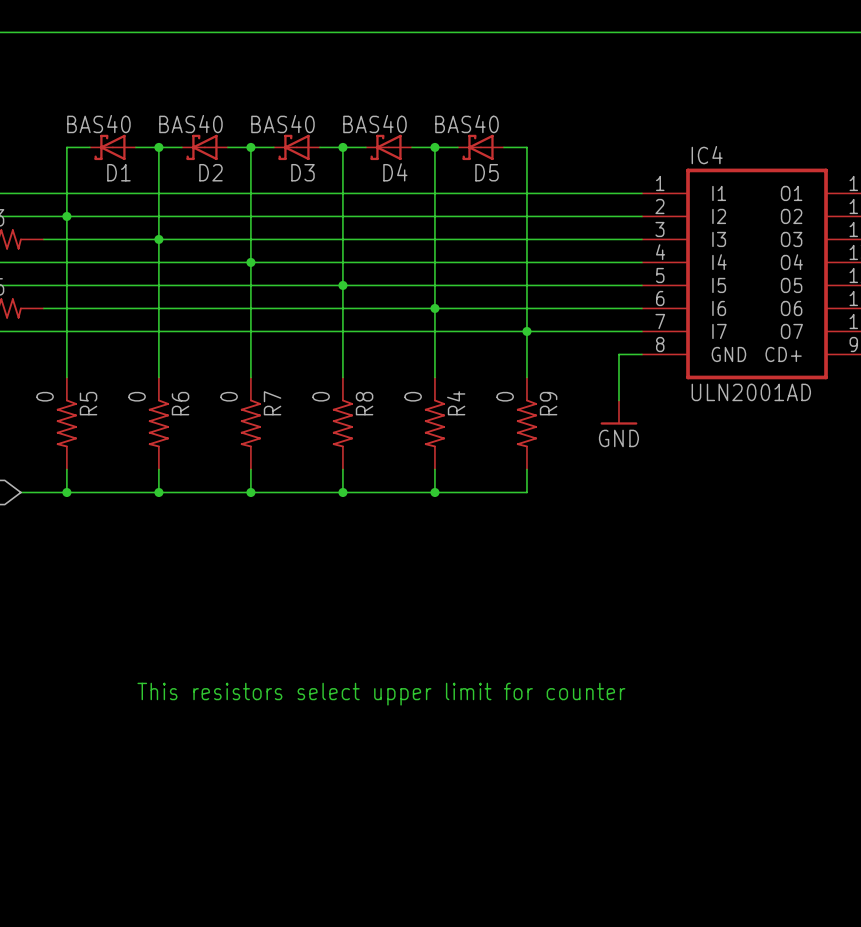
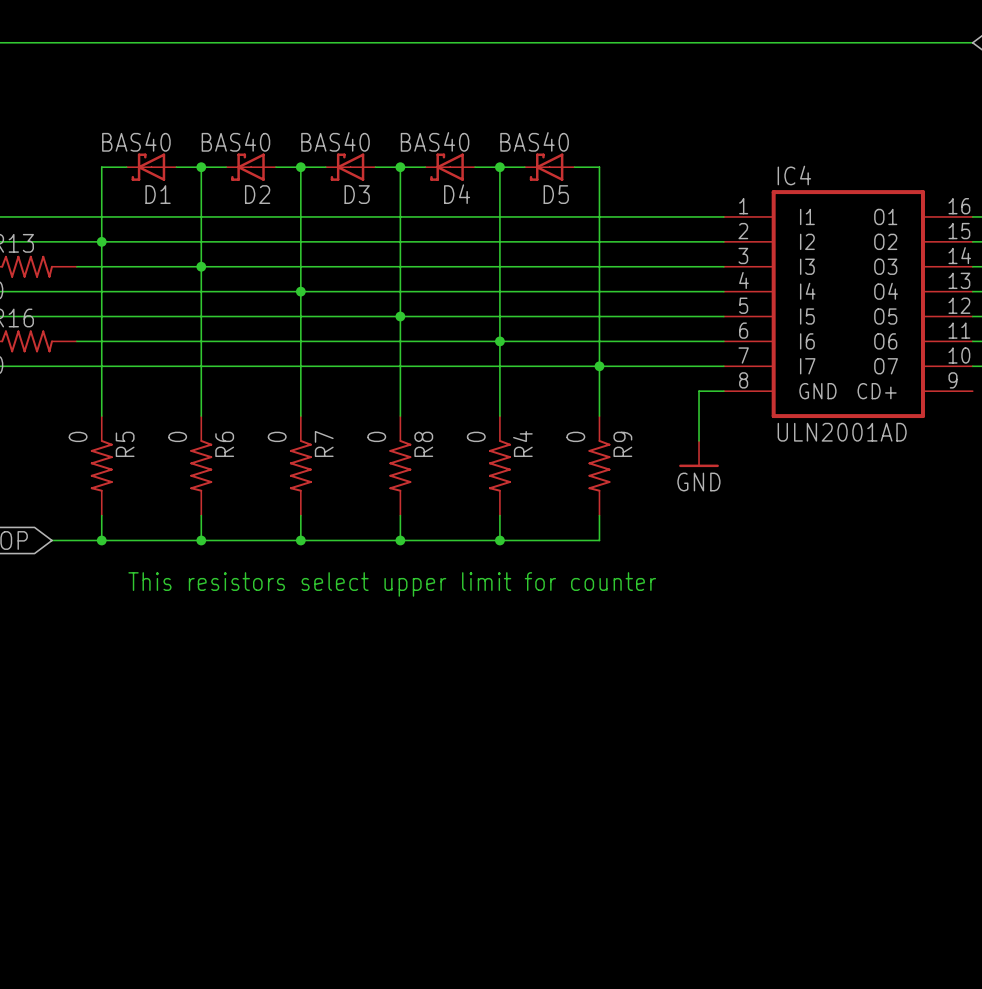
text position: This resistors select upper limit for counter (381, 694) -> This resistors select upper limit for counter (392, 584)

